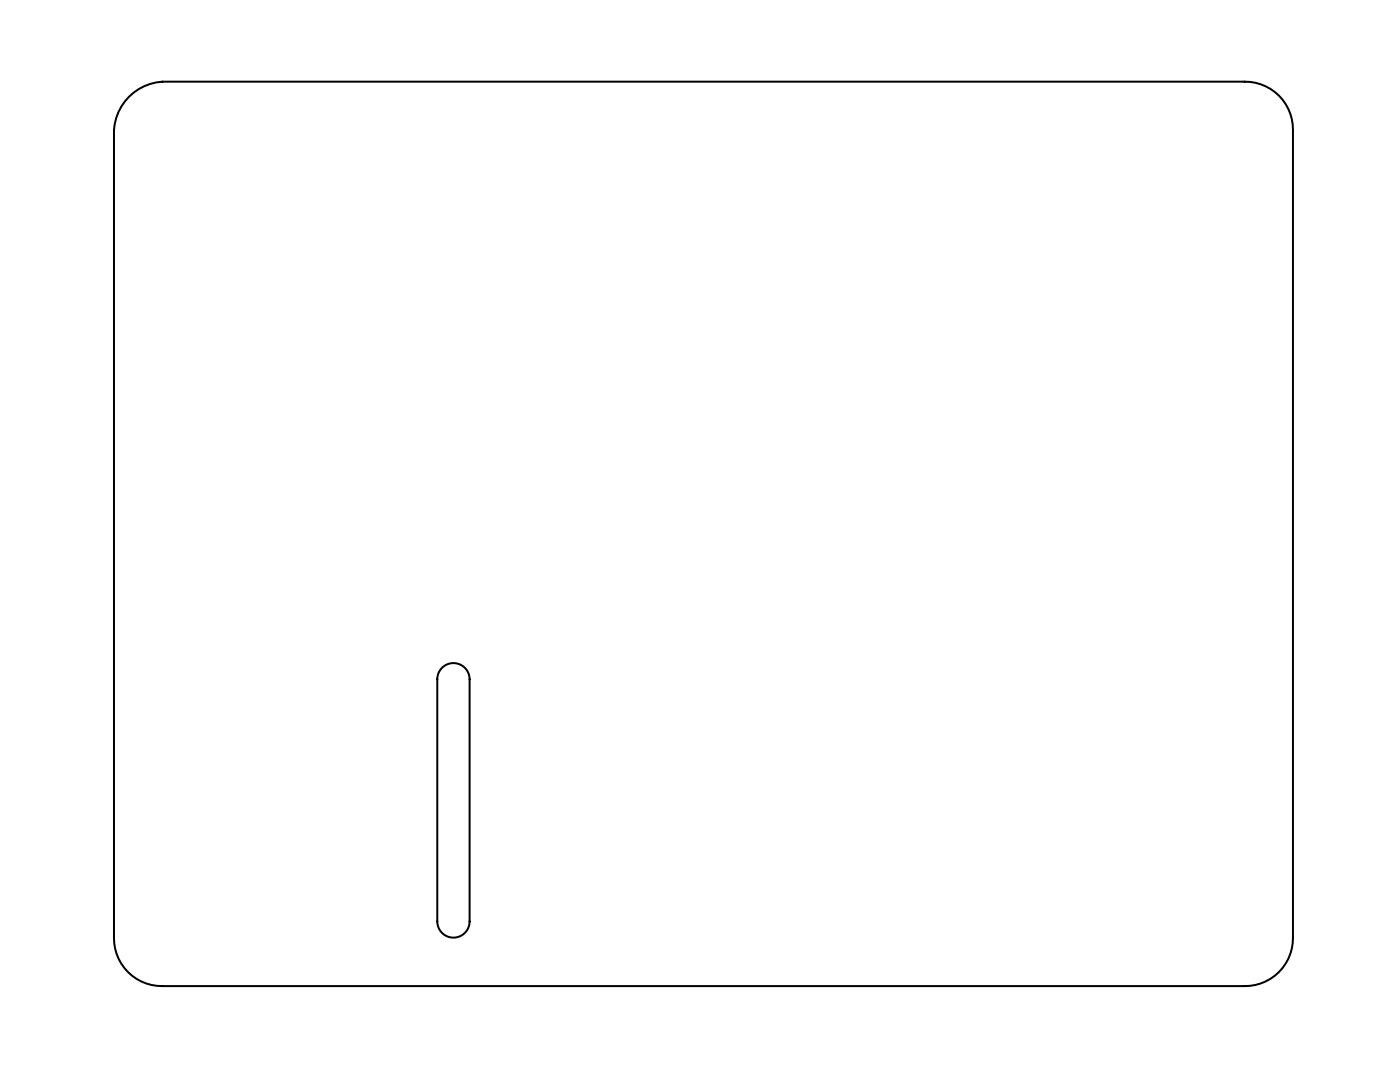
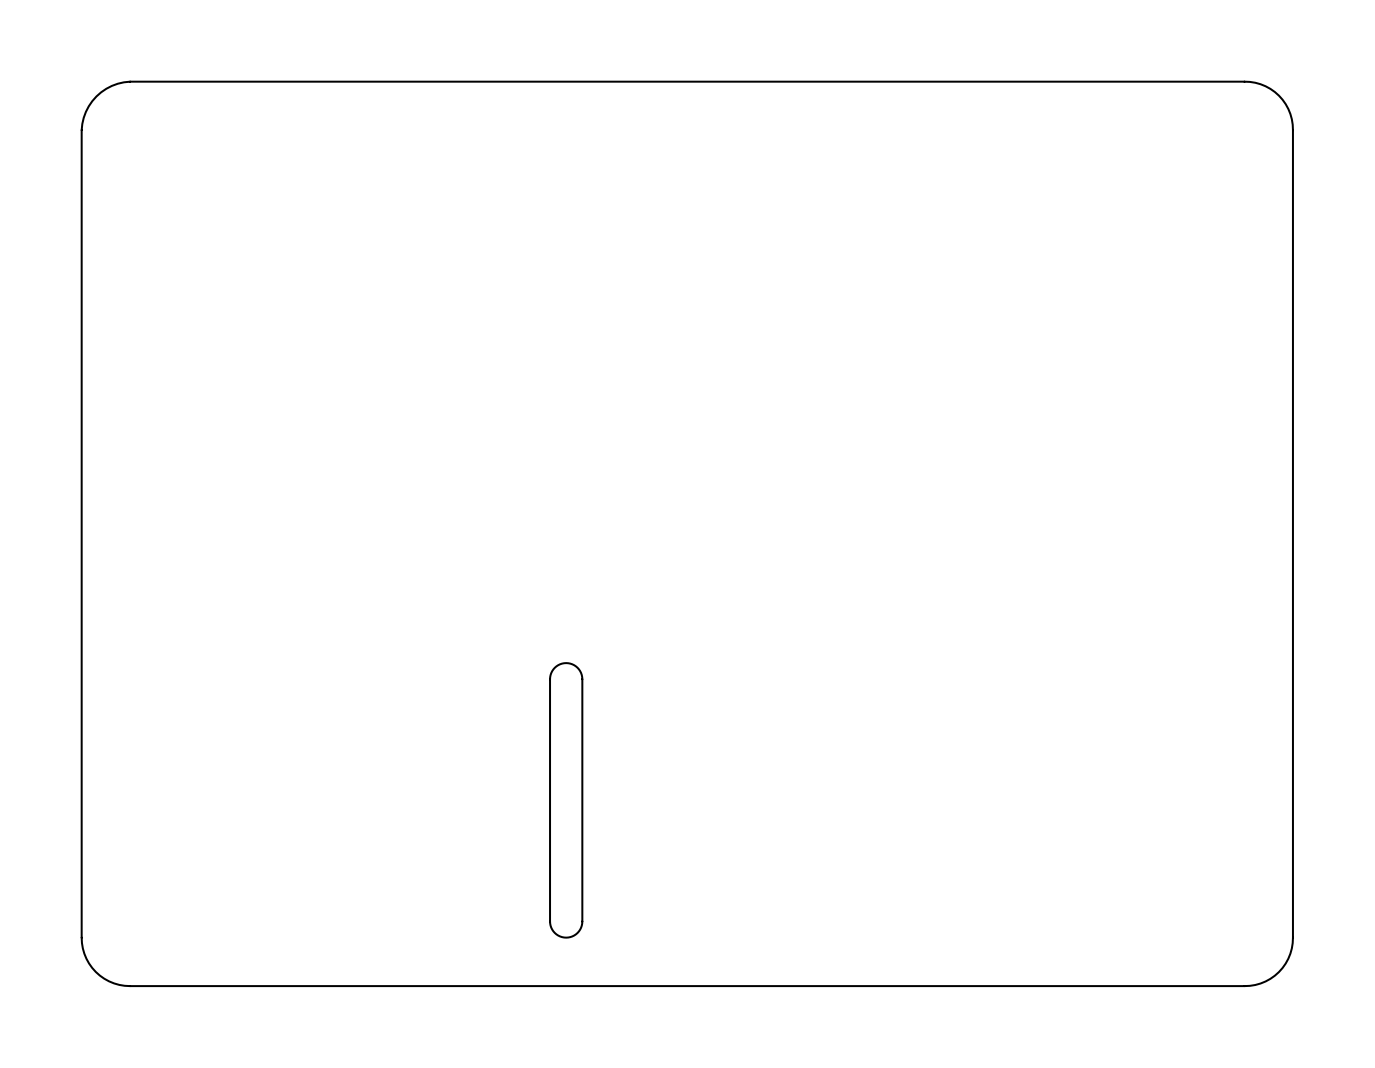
board edge: (162, 81) (144, 86) (129, 96) (118, 112) (113, 130) (114, 943) (118, 958) (132, 975) (146, 983) (162, 986) -> (162, 81) (123, 82) (106, 88) (96, 96) (88, 106) (83, 117) (81, 130) (81, 943) (89, 963) (95, 971) (109, 981) (124, 985) (162, 986)
board edge: (469, 679) (469, 923) (463, 934) (451, 937) (440, 931) (437, 921) (437, 677) (442, 667) (453, 663) (465, 668) (469, 679) -> none
board edge: none -> (582, 679) (582, 923) (576, 934) (564, 937) (553, 931) (550, 921) (550, 677) (554, 667) (566, 663) (577, 667) (582, 679)

